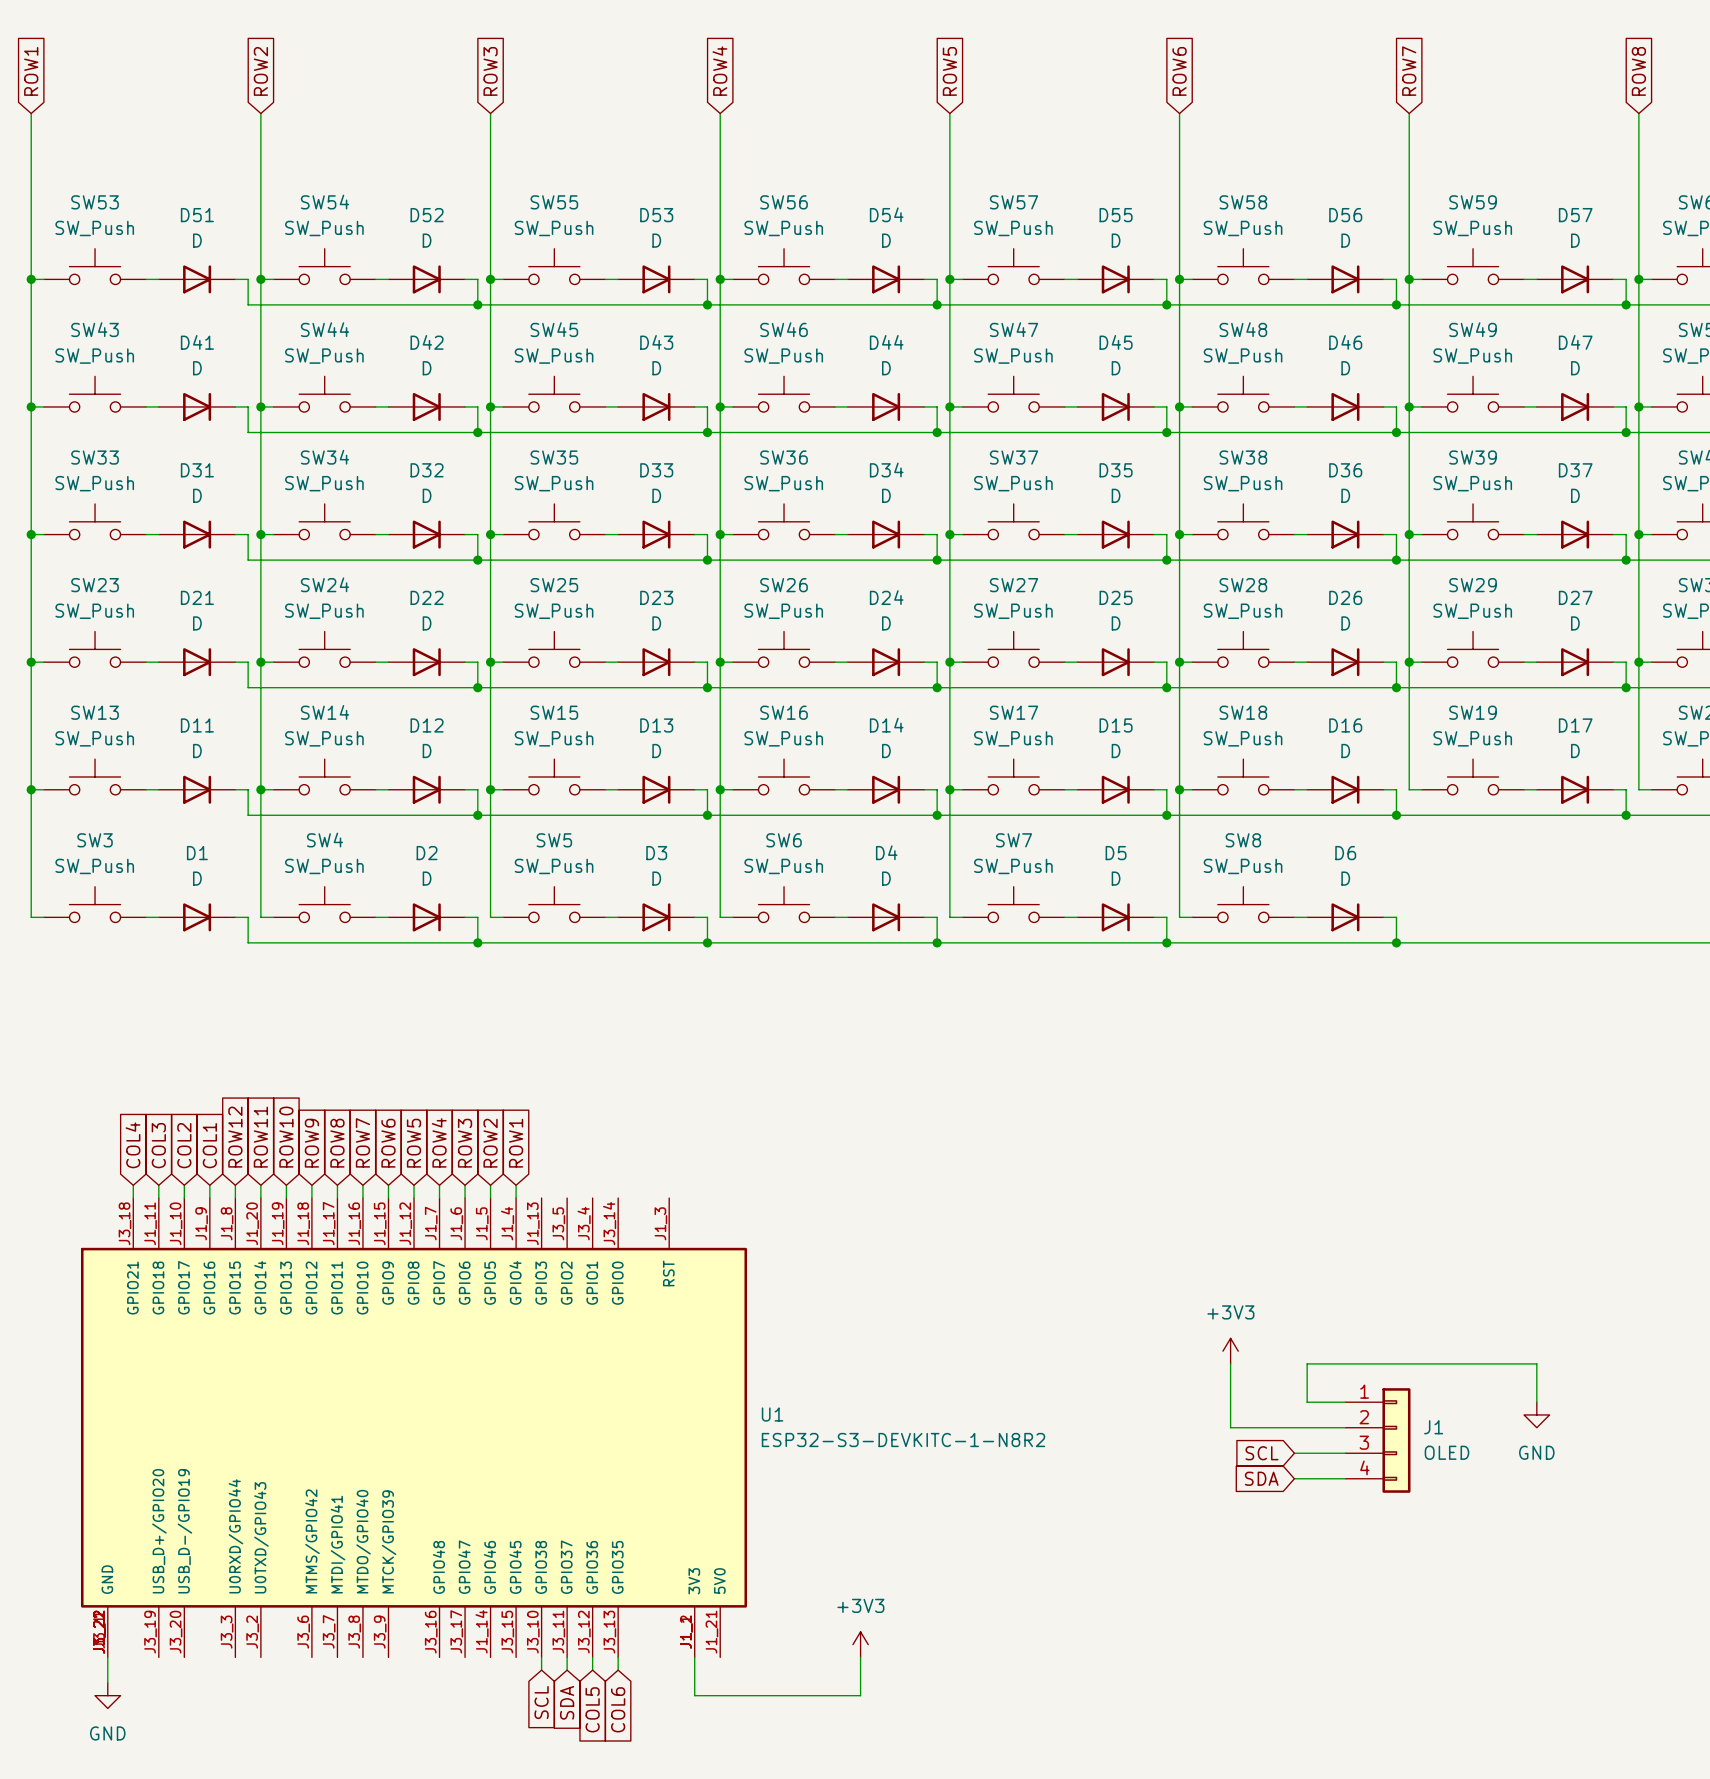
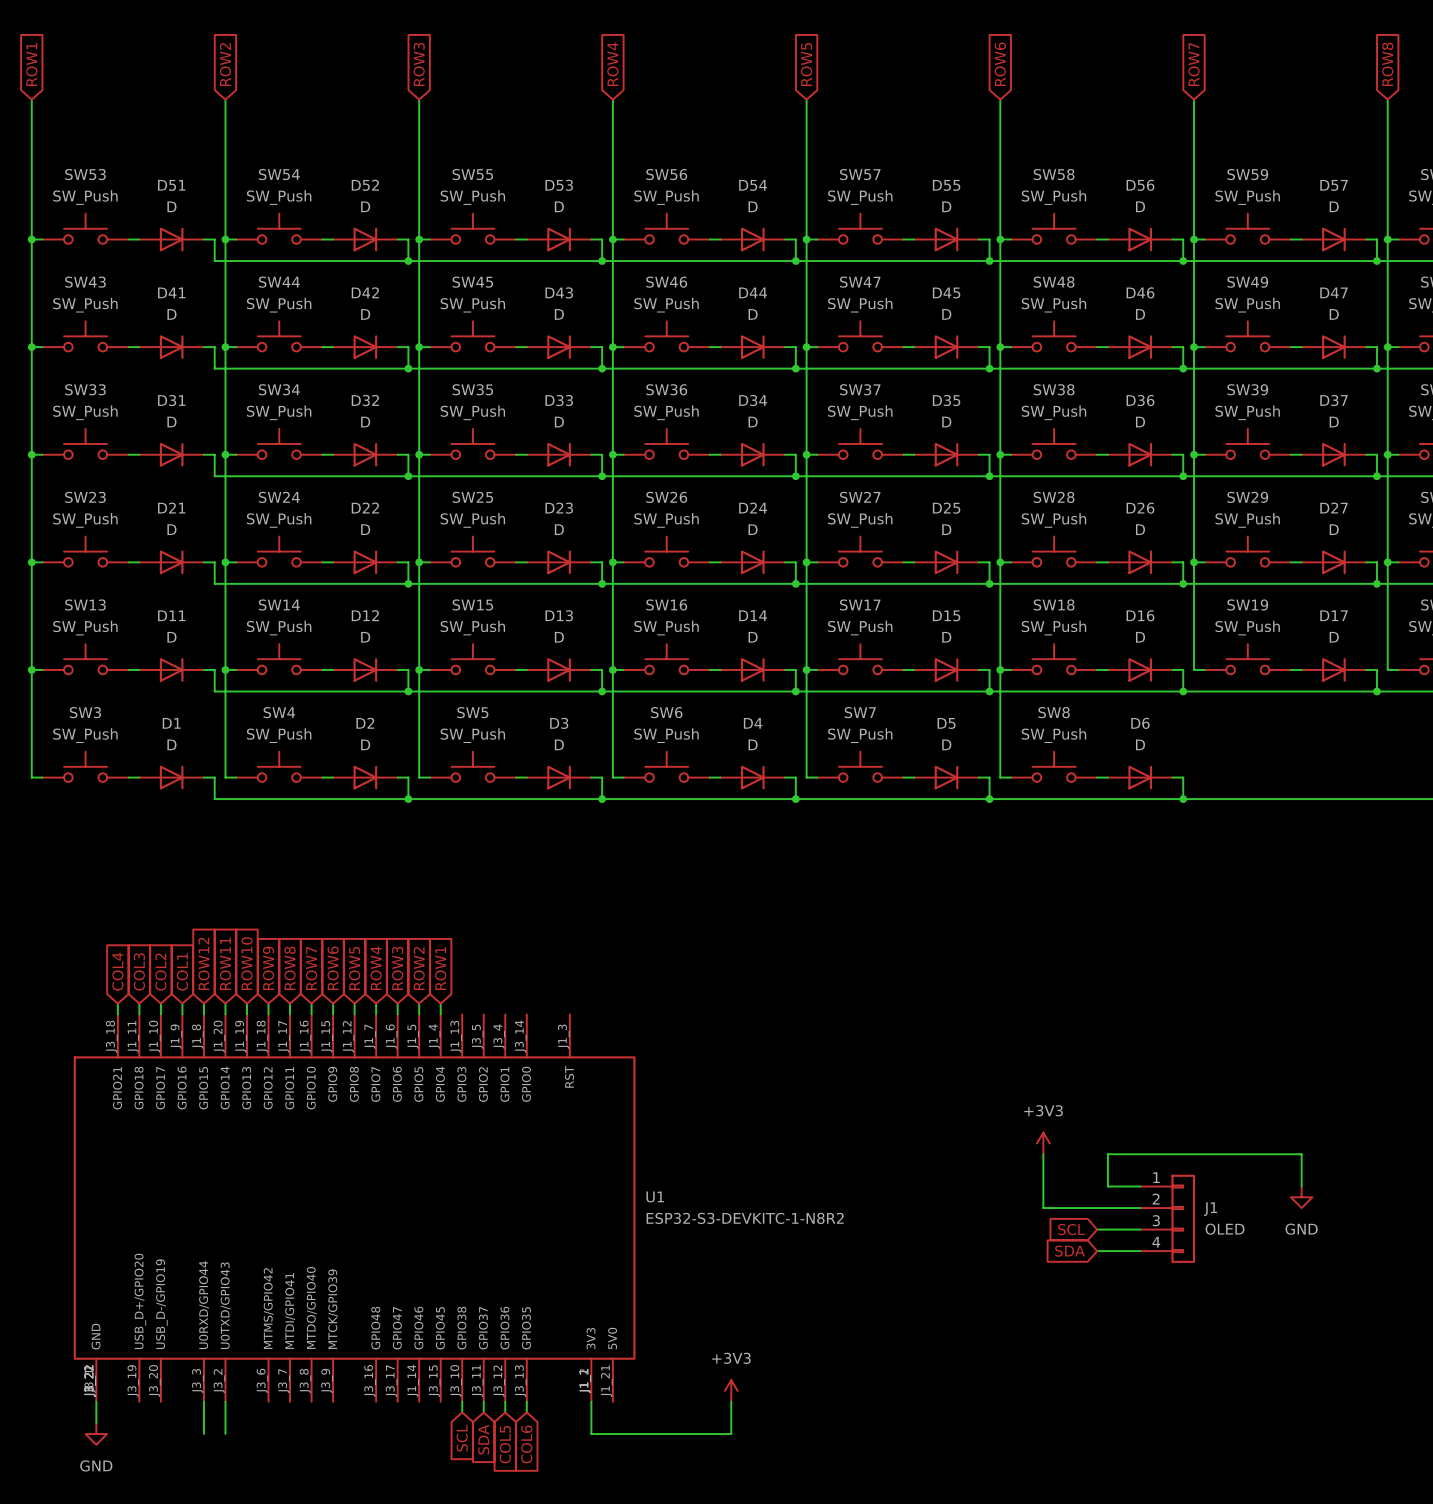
wire: none -> (203, 1401) (203, 1434)
wire: none -> (225, 1401) (225, 1434)

